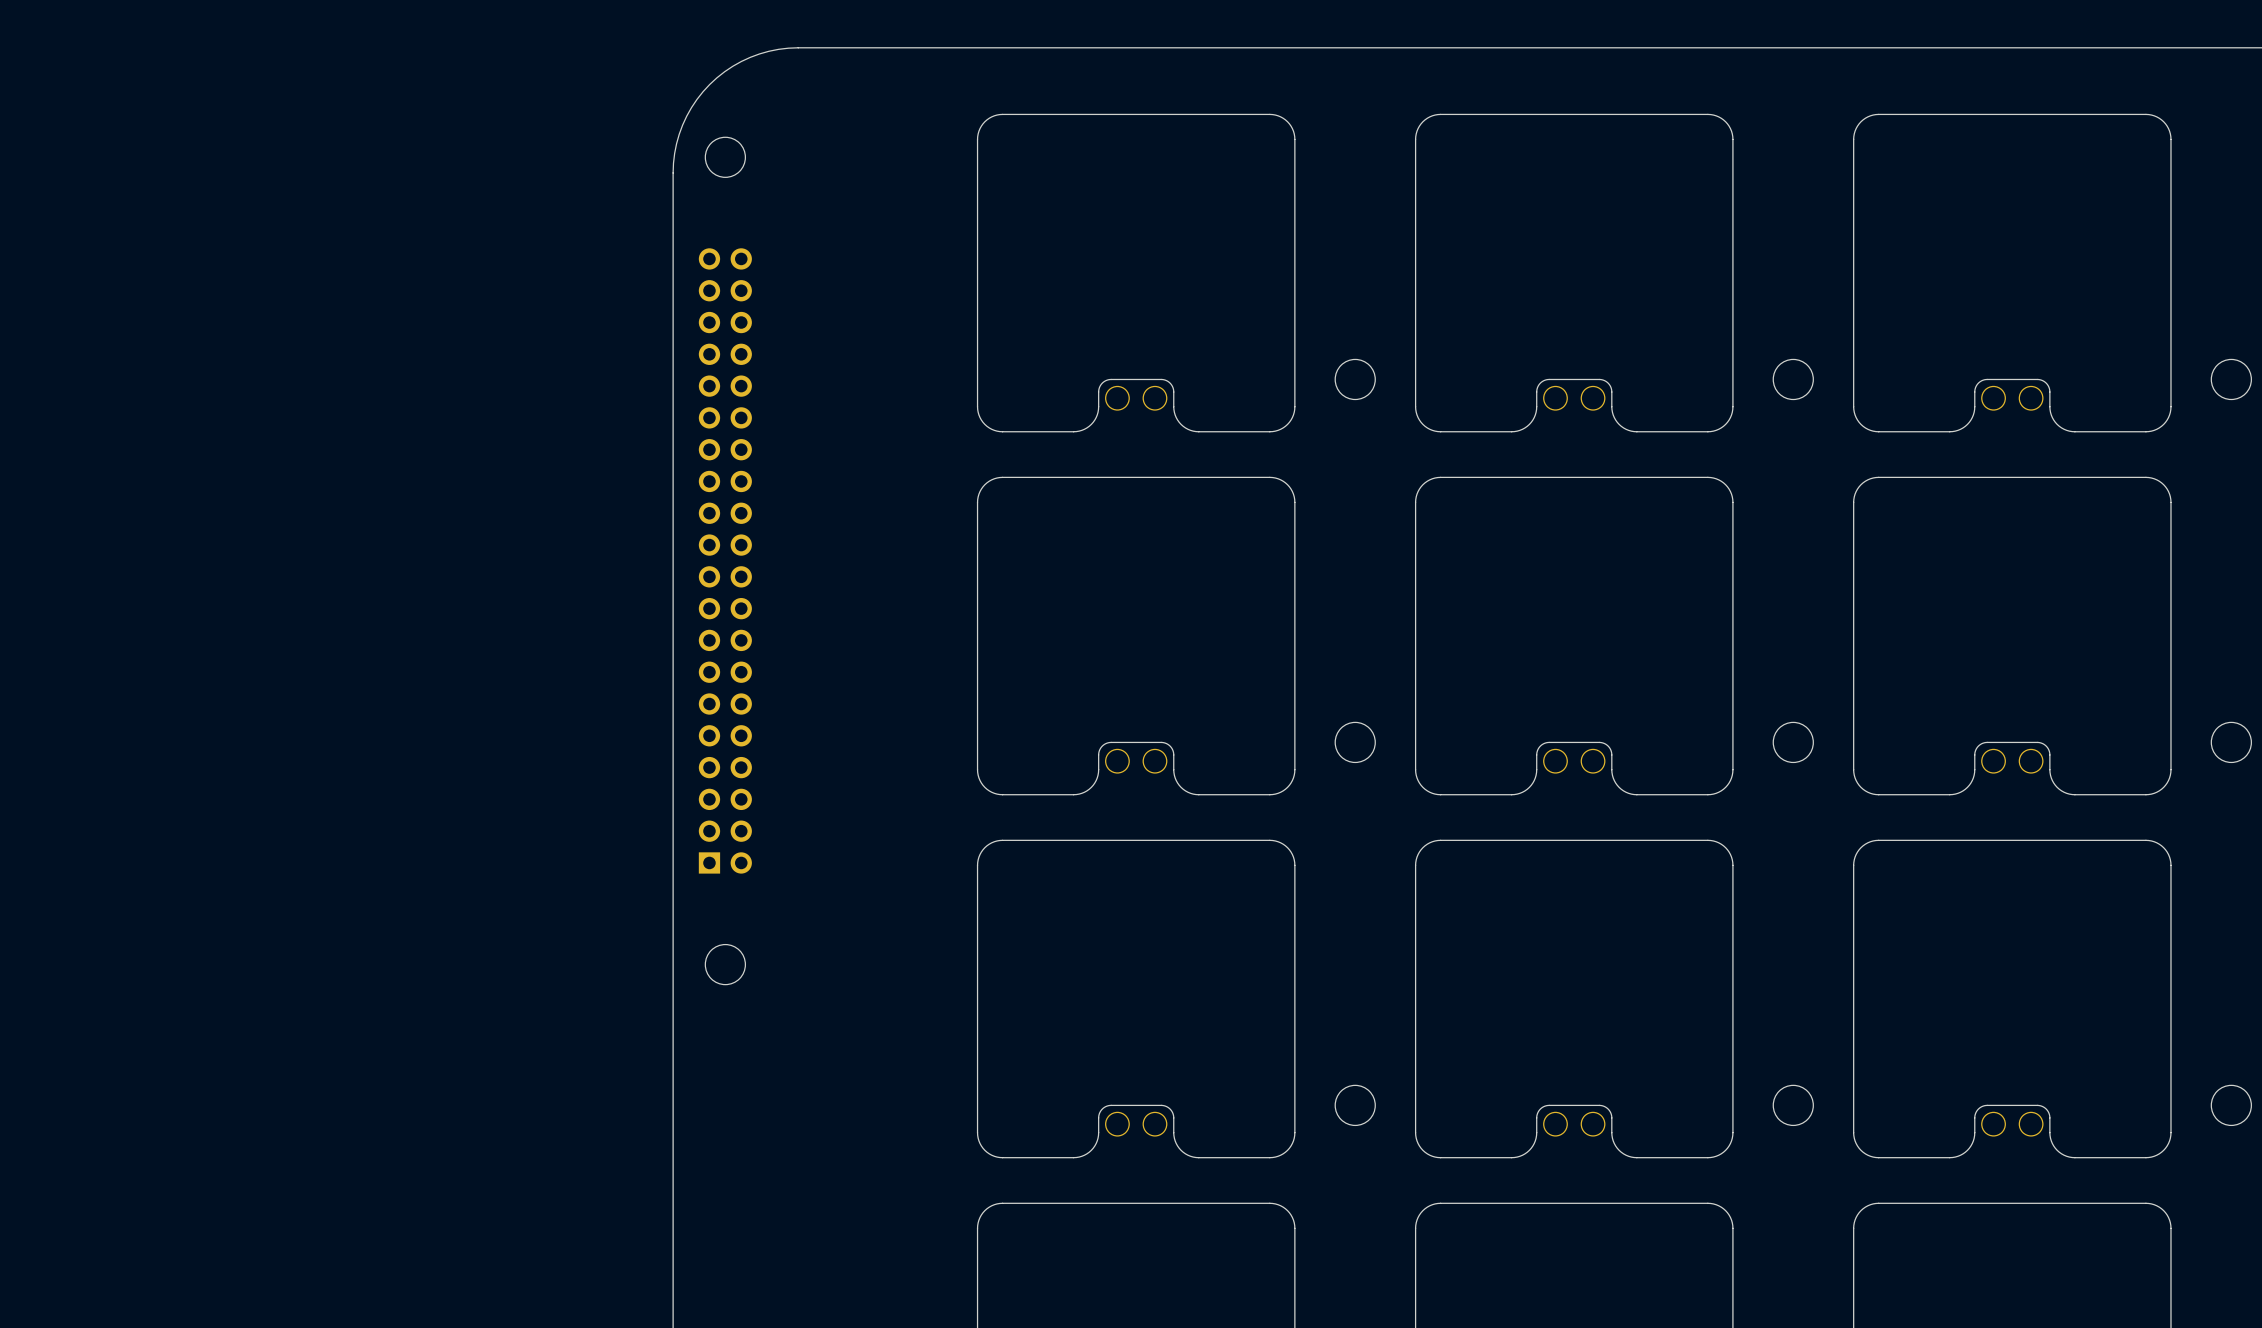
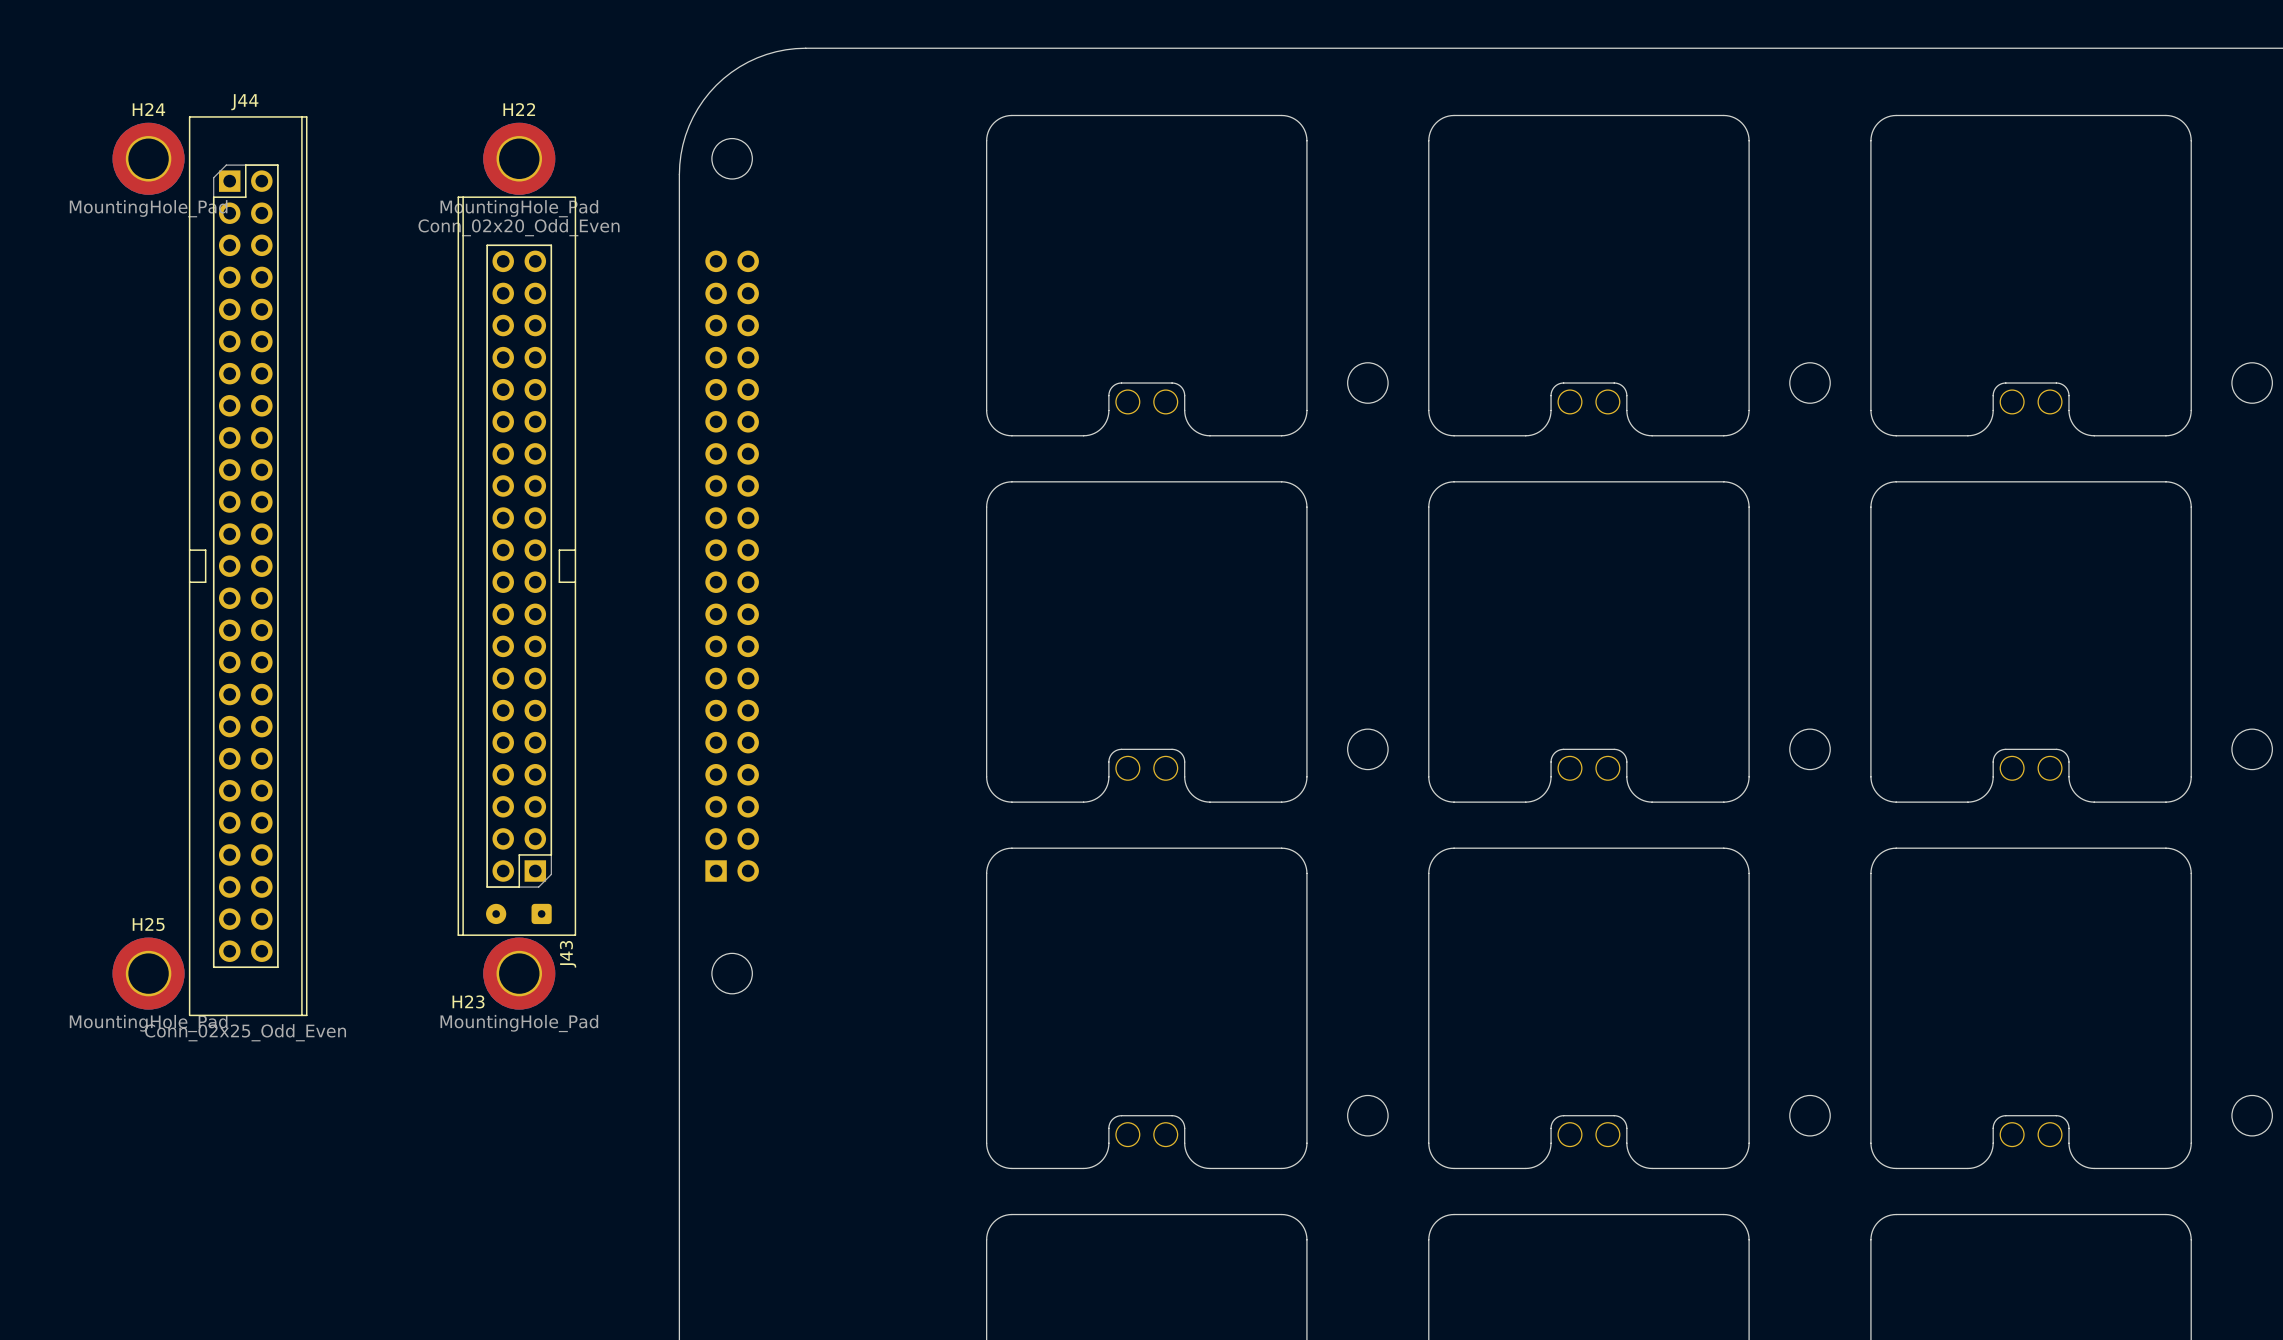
H24: none -> MountingHole_Pad (148, 158)
H22: none -> MountingHole_Pad (519, 158)
J44: none -> Conn_02x25_Odd_Even (248, 566)
J43: none -> Conn_02x20_Odd_Even (516, 566)
part: none -> (518, 913)
H25: none -> MountingHole_Pad (148, 973)
H23: none -> MountingHole_Pad (519, 973)

